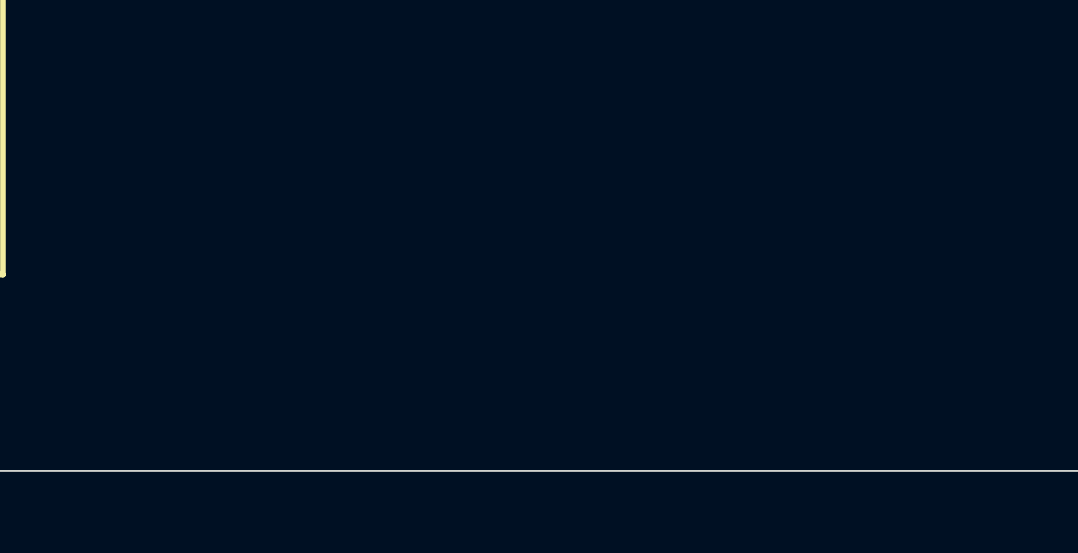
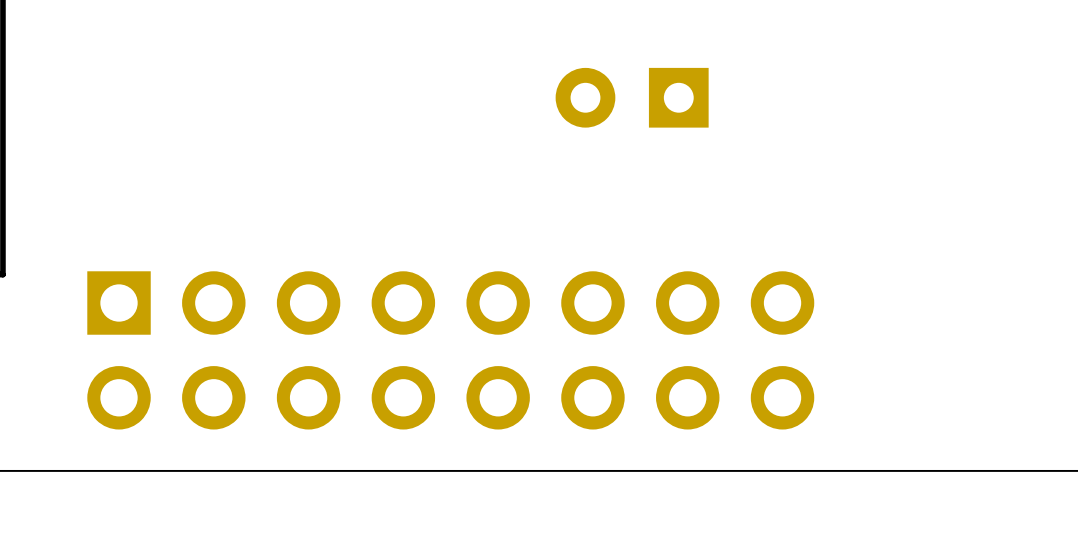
part: none -> (632, 97)
part: none -> (450, 350)

